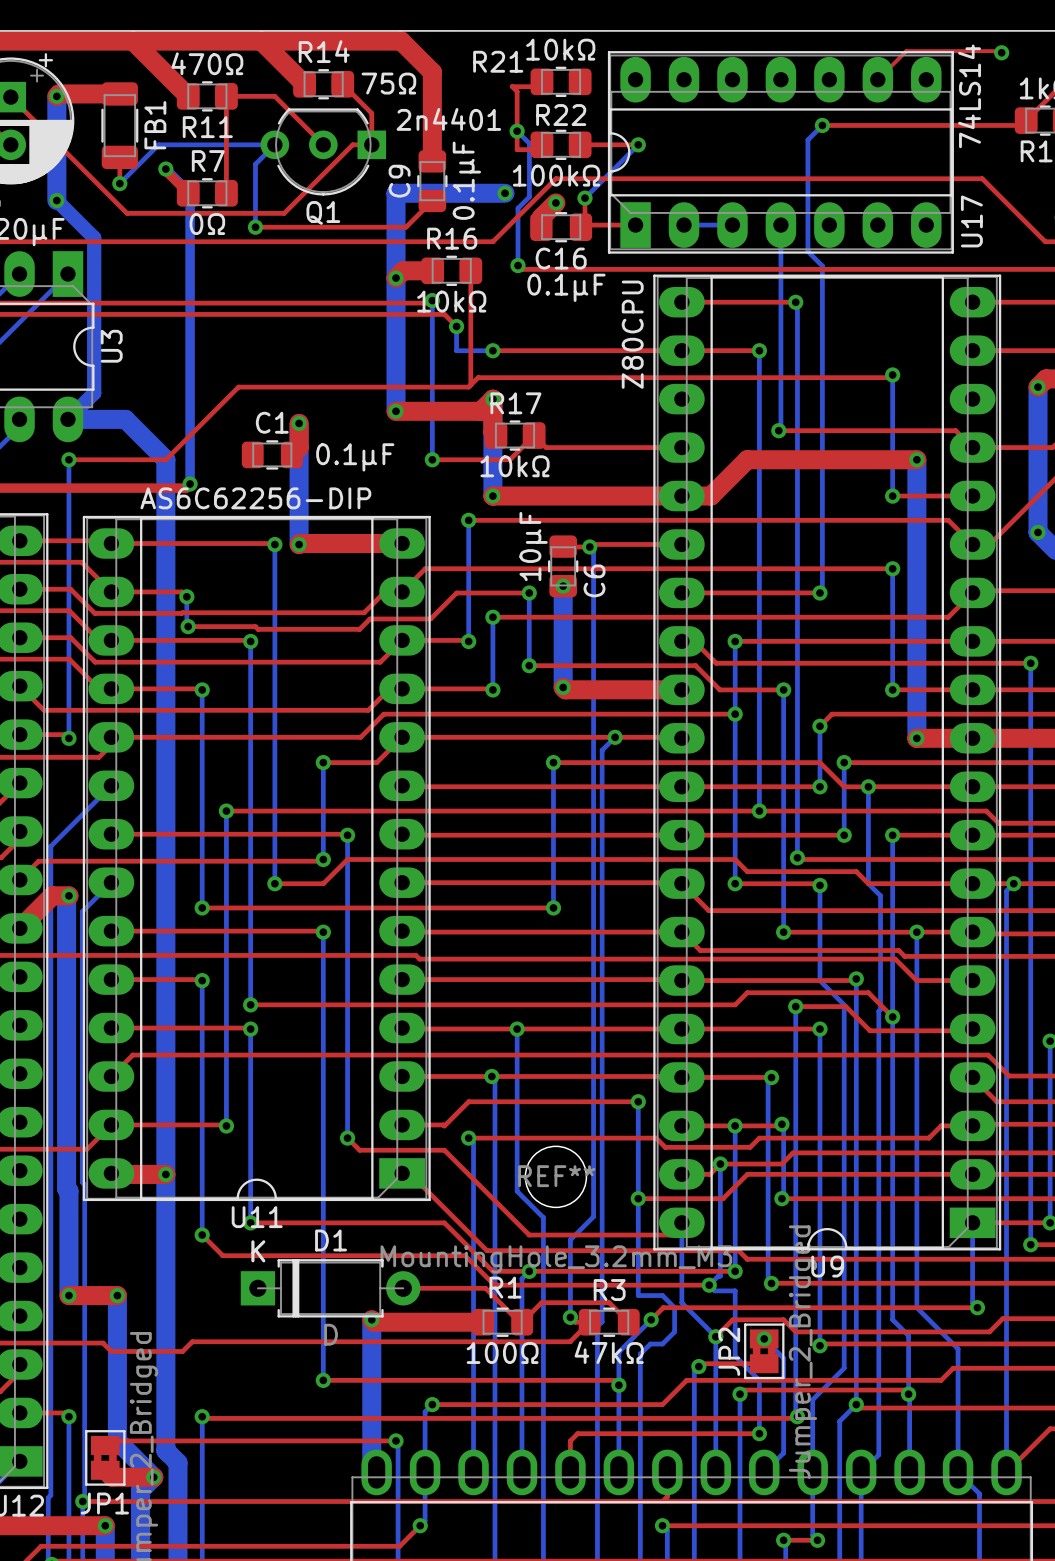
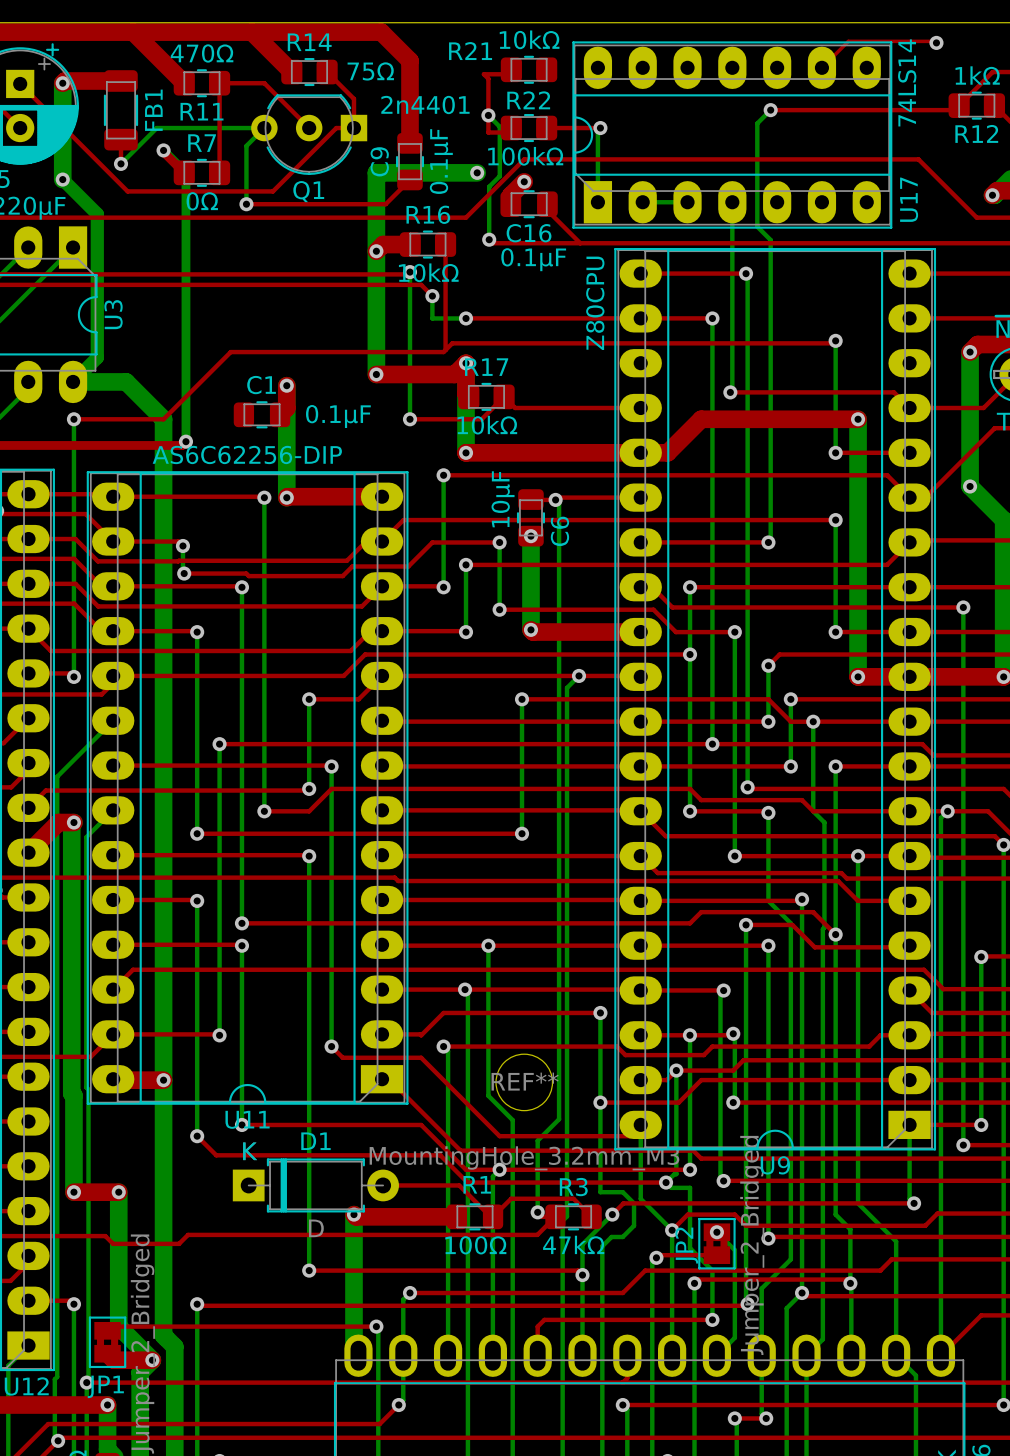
bottom track: (638, 144) (584, 198) -> none
bottom track: none -> (602, 128) (597, 132) (597, 202)
top track: (584, 198) (585, 227) (587, 225) (635, 225) -> none
via: (584, 198) -> none
top track: none -> (547, 204) (547, 210) (580, 243)

